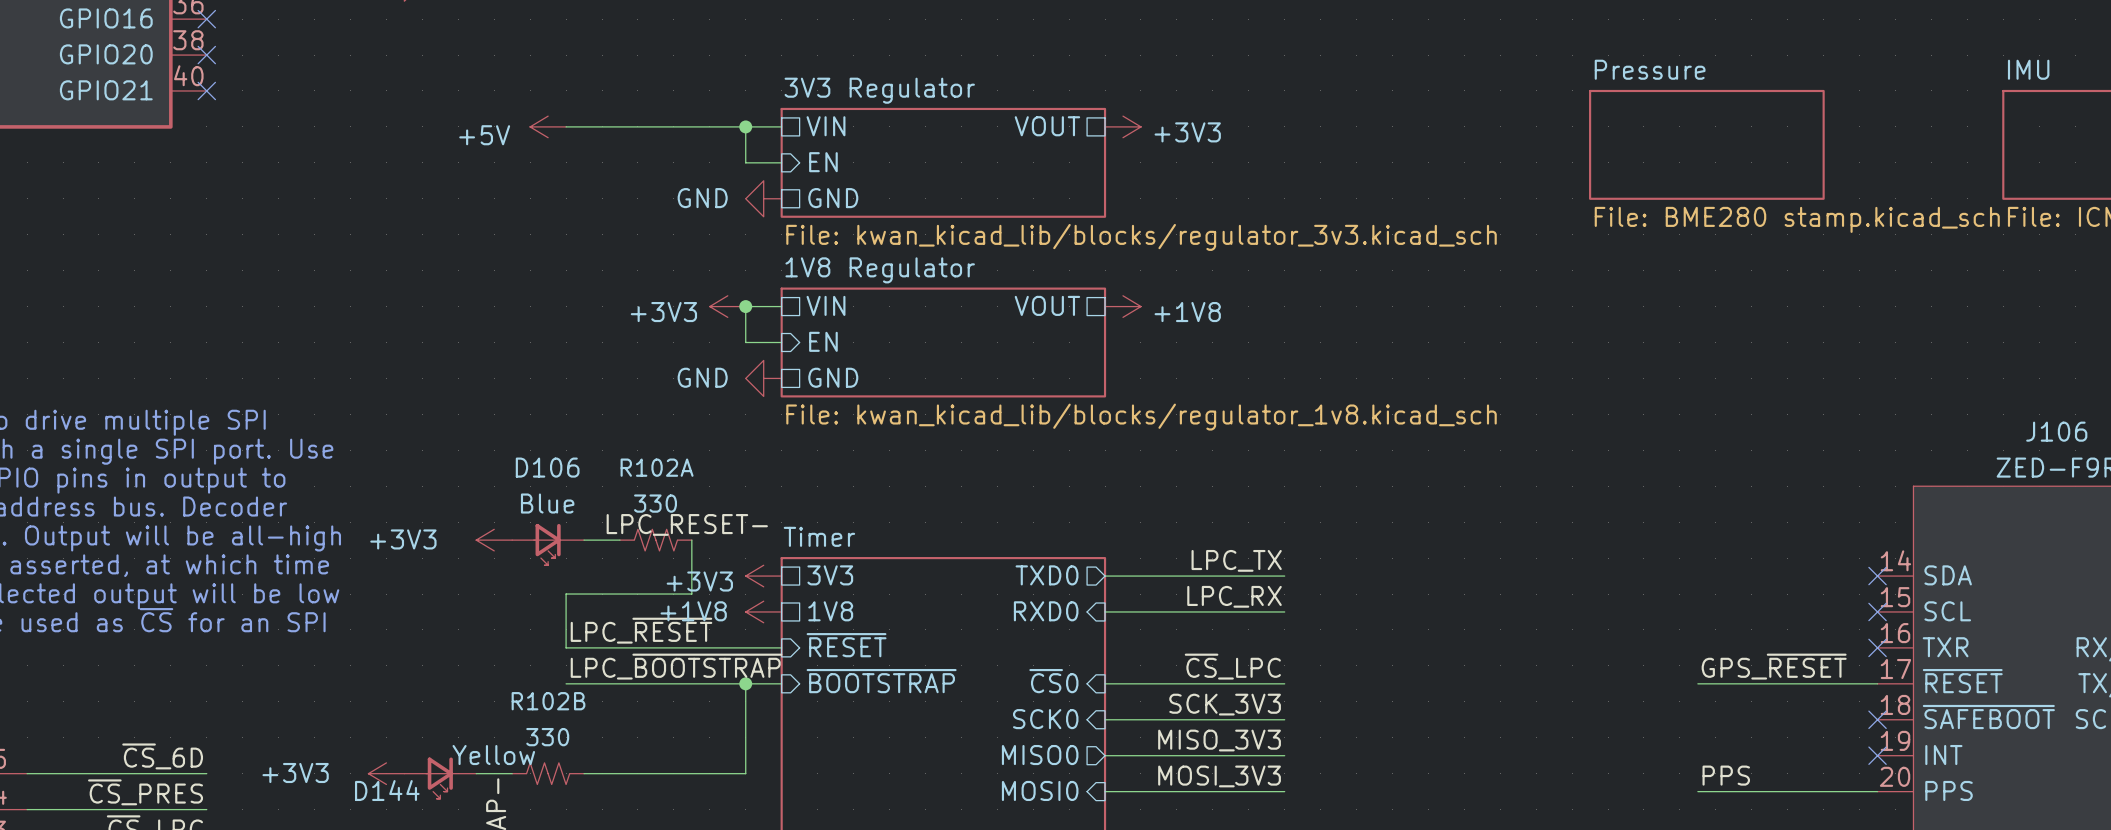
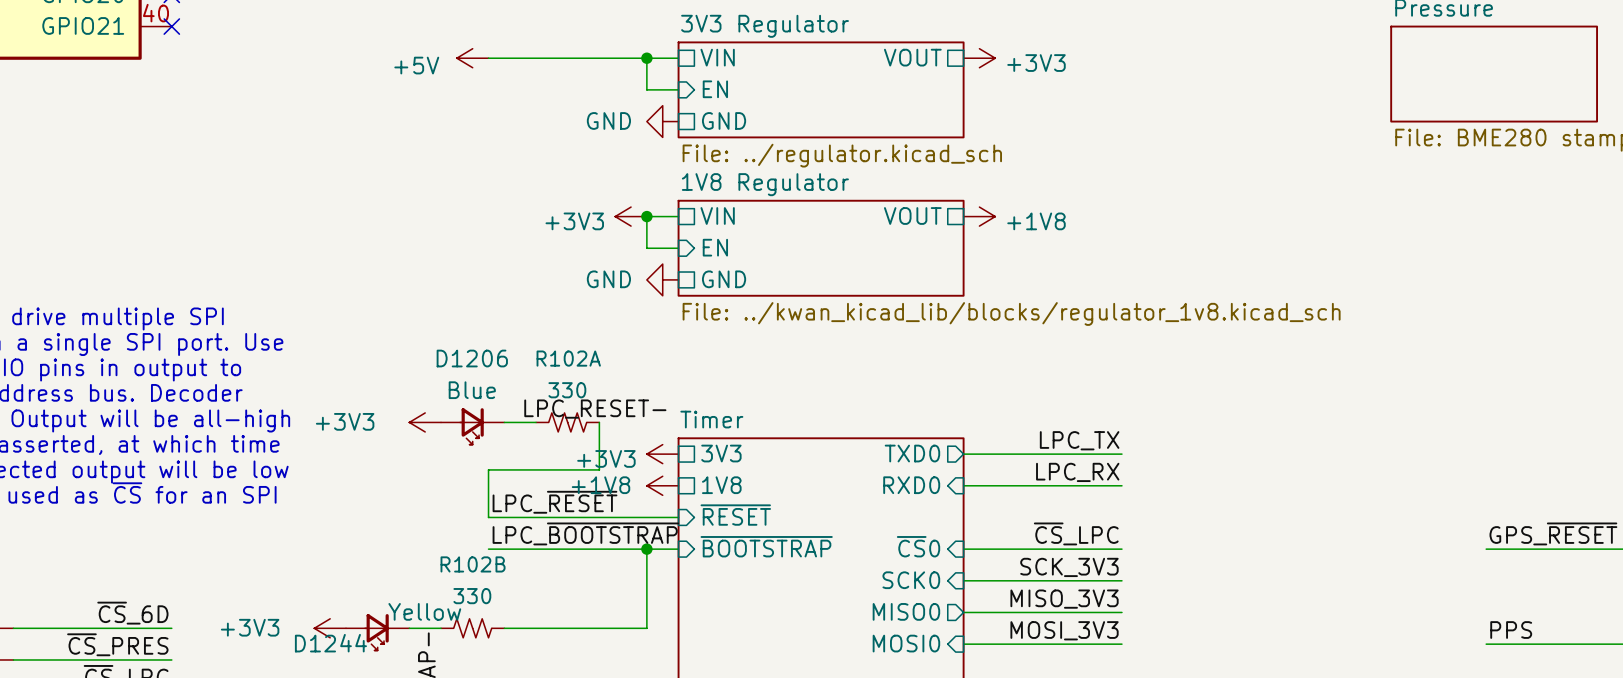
sheet 3V3 Regulator value: File: kwan_kicad_lib/blocks/regulator_3v3.kicad_sch (1141, 237) -> File: ../regulator.kicad_sch (842, 155)
sheet 1V8 Regulator value: File: kwan_kicad_lib/blocks/regulator_1v8.kicad_sch (1141, 417) -> File: ../kwan_kicad_lib/blocks/regulator_1v8.kicad_sch (1011, 313)
D106 name: D106 (547, 467) -> D1206 (472, 358)
D144 name: D144 (387, 790) -> D1244 (330, 643)

